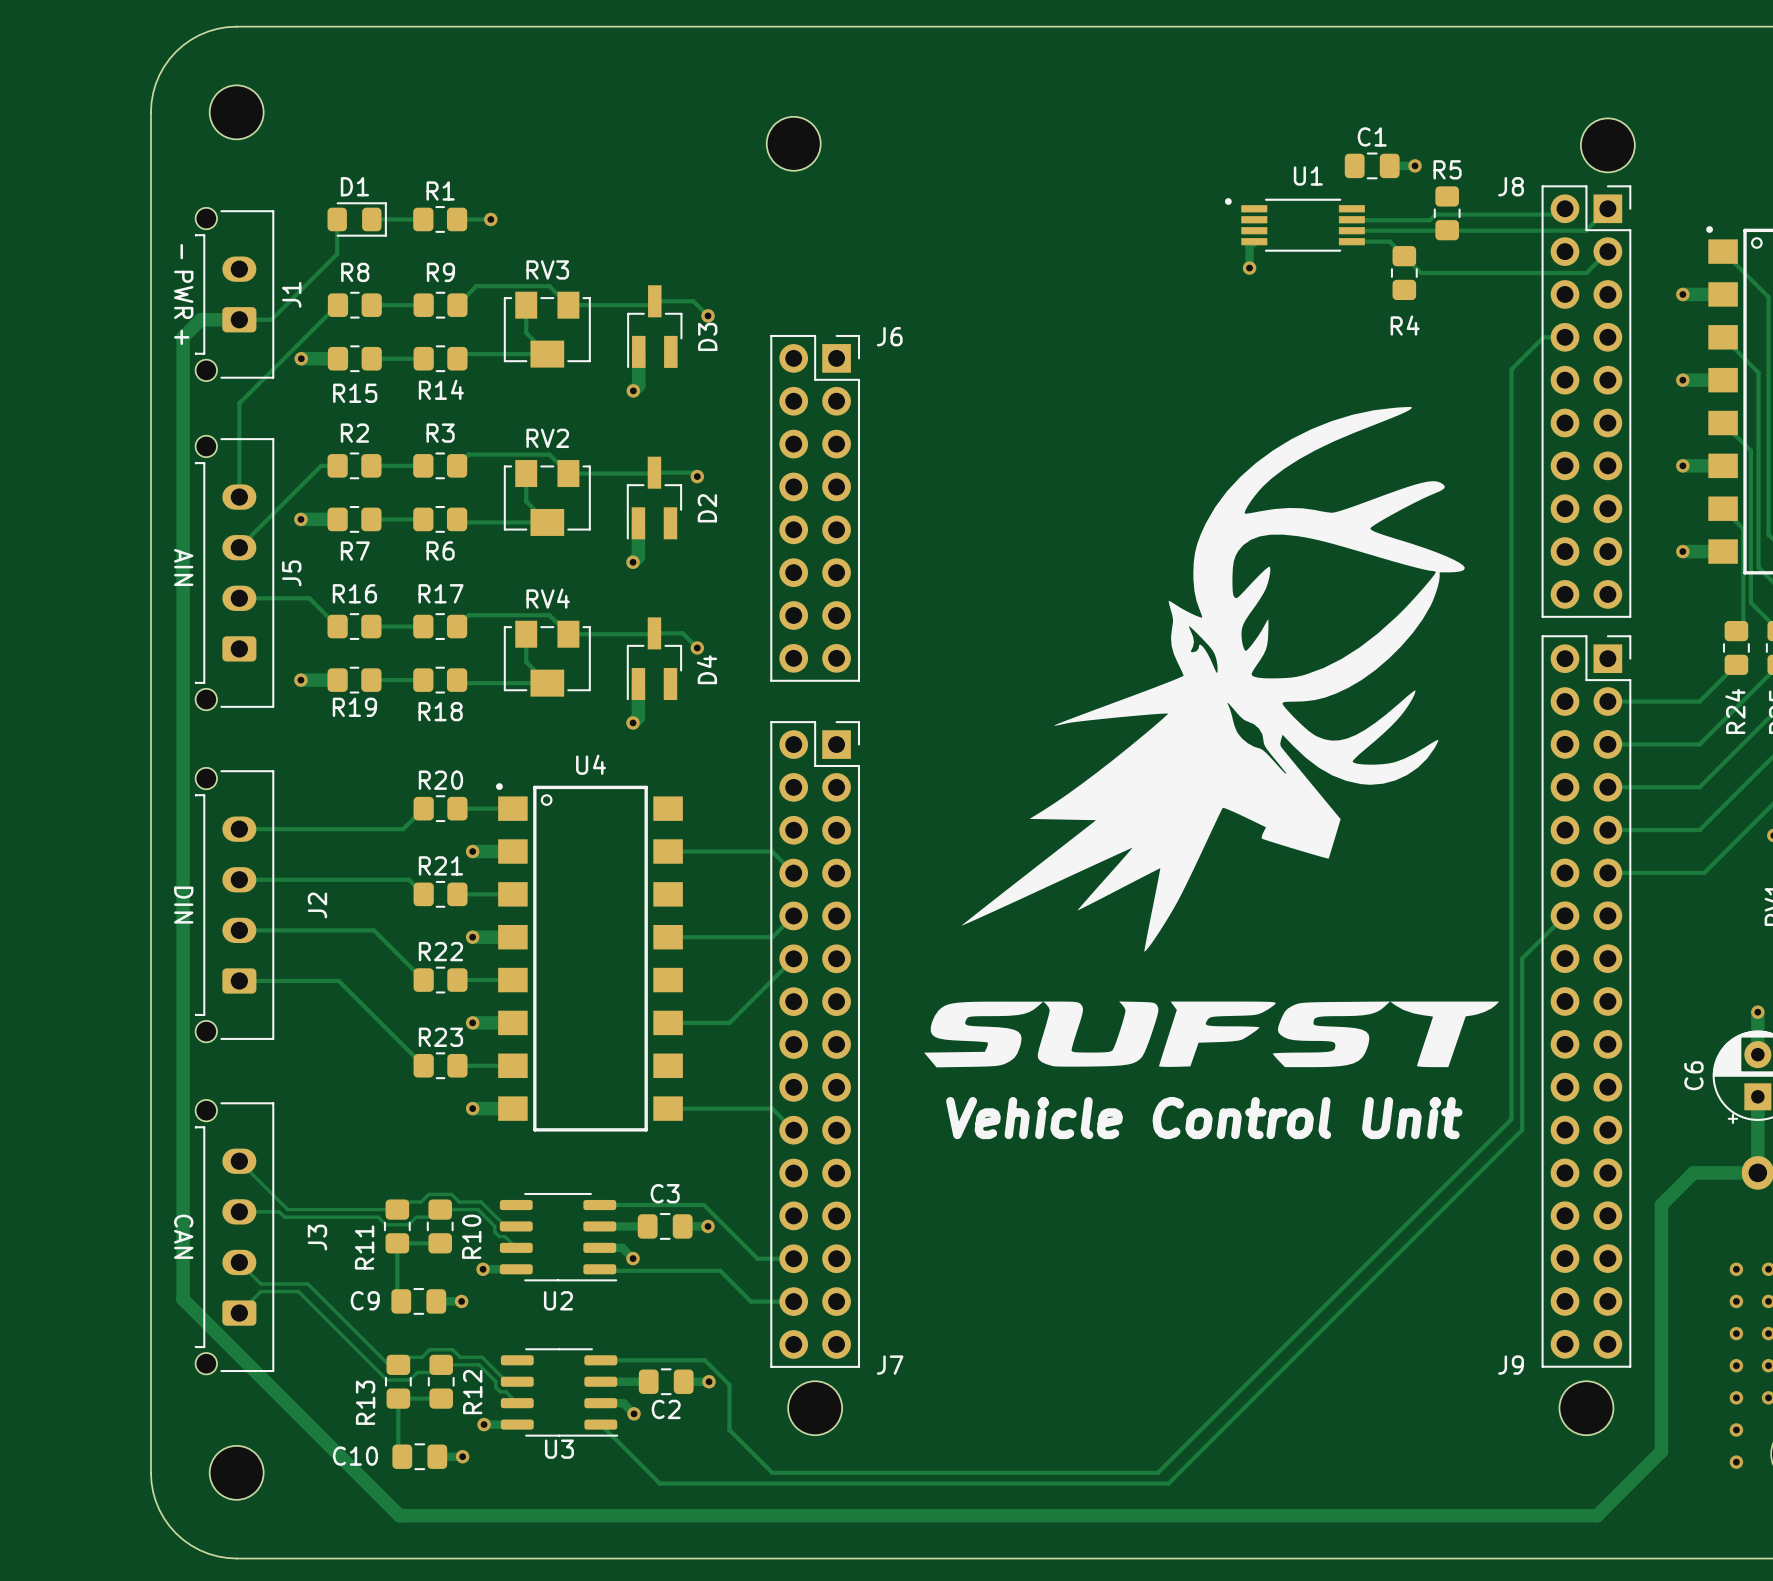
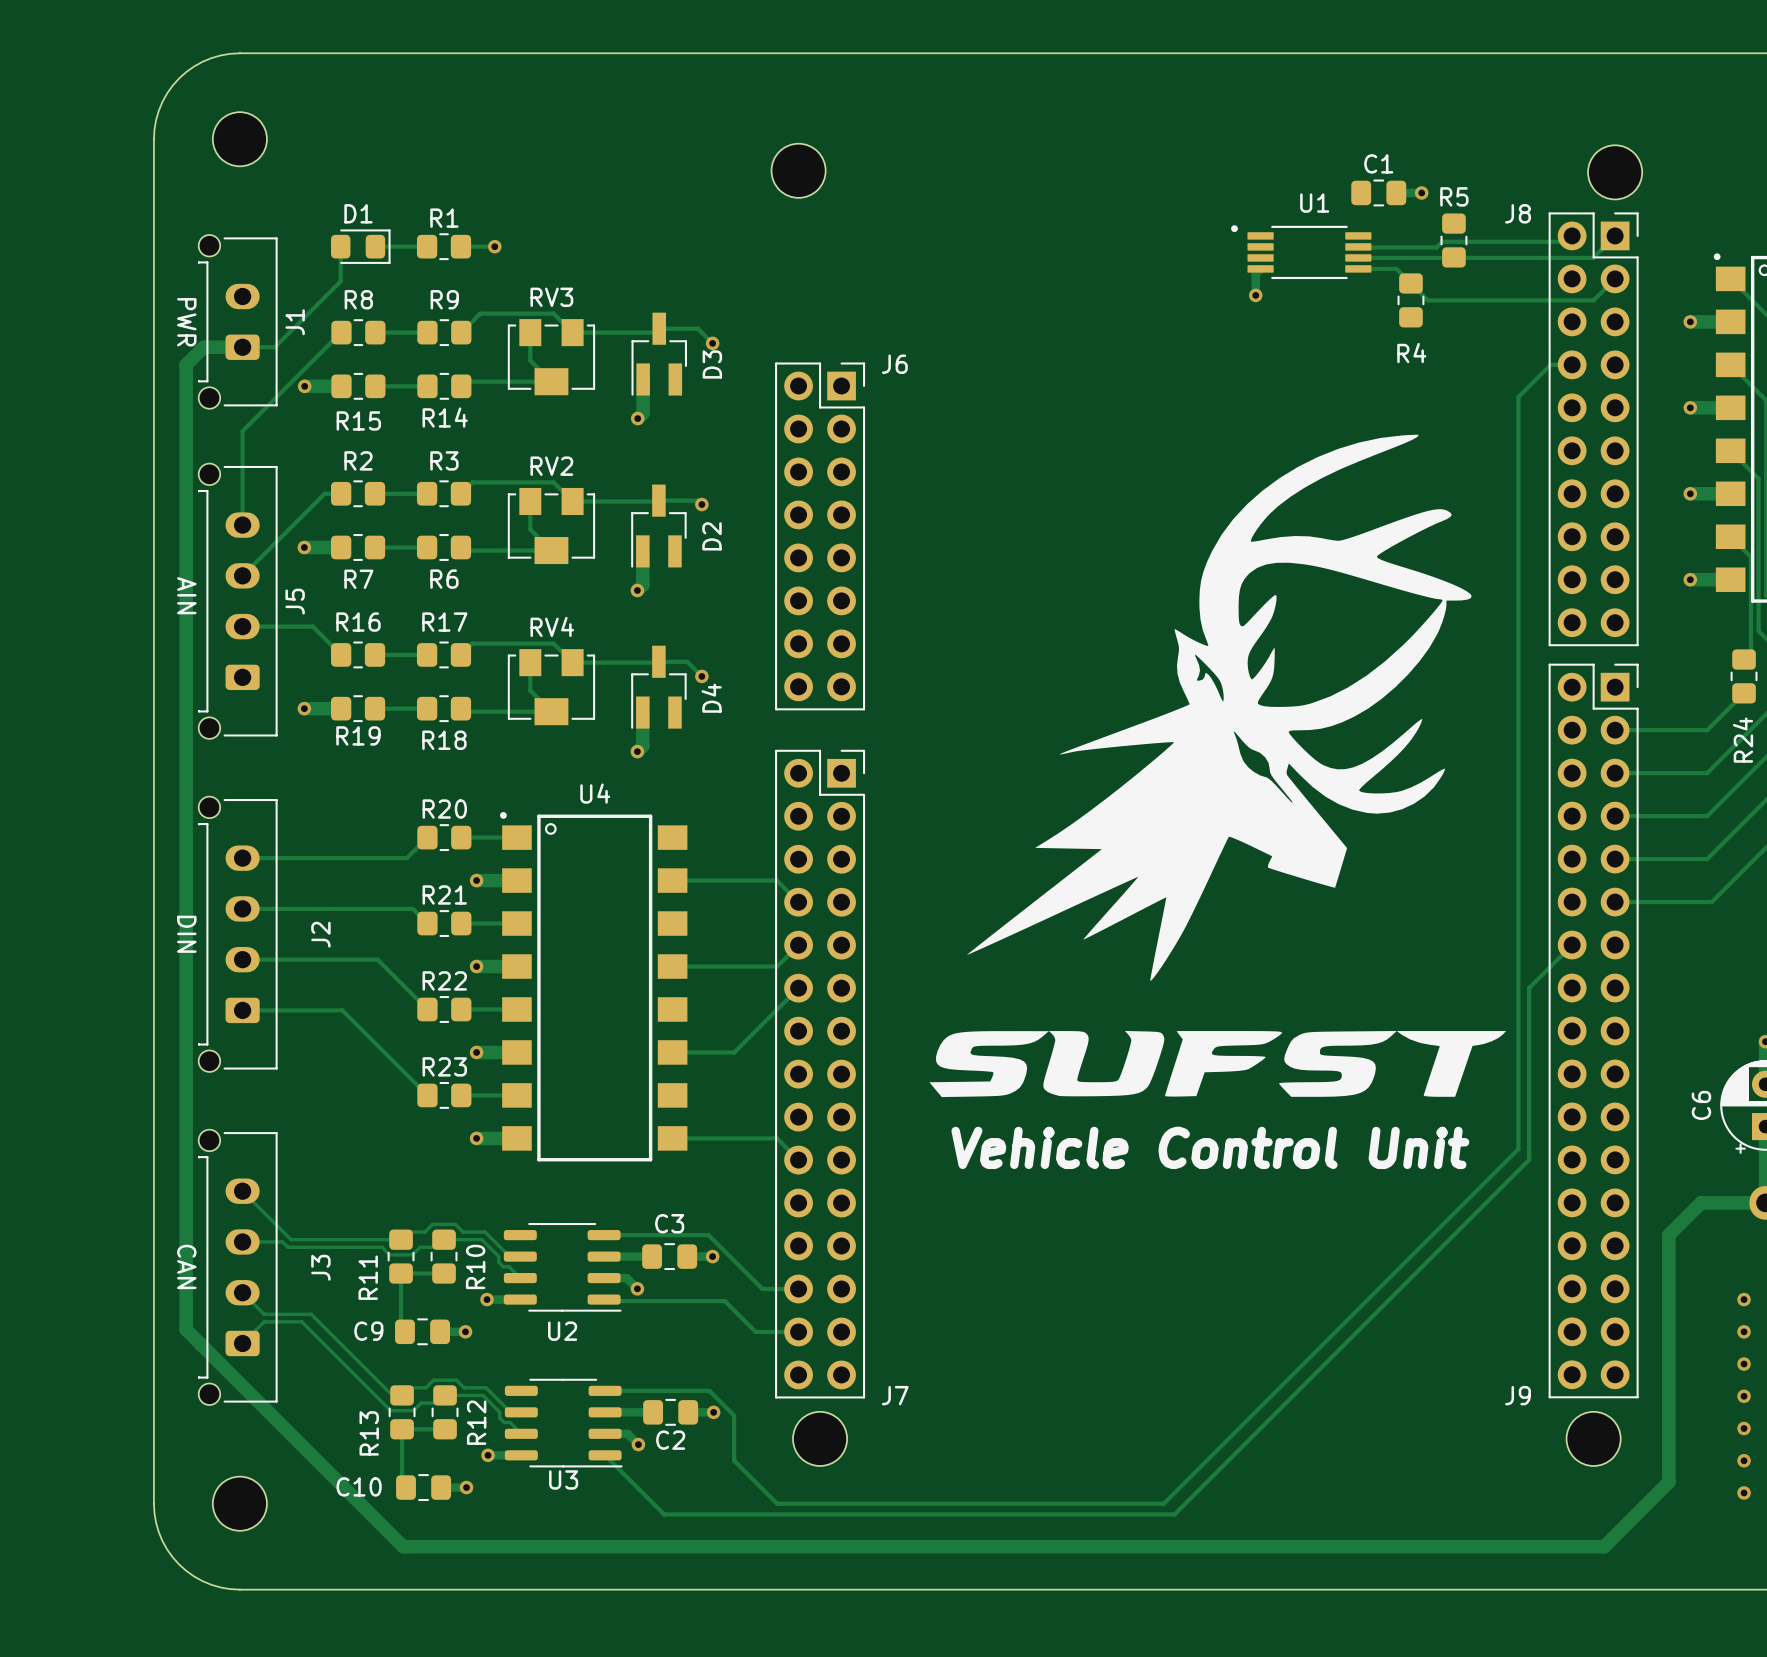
text: - (181, 251) -> none
text: + (181, 337) -> none

